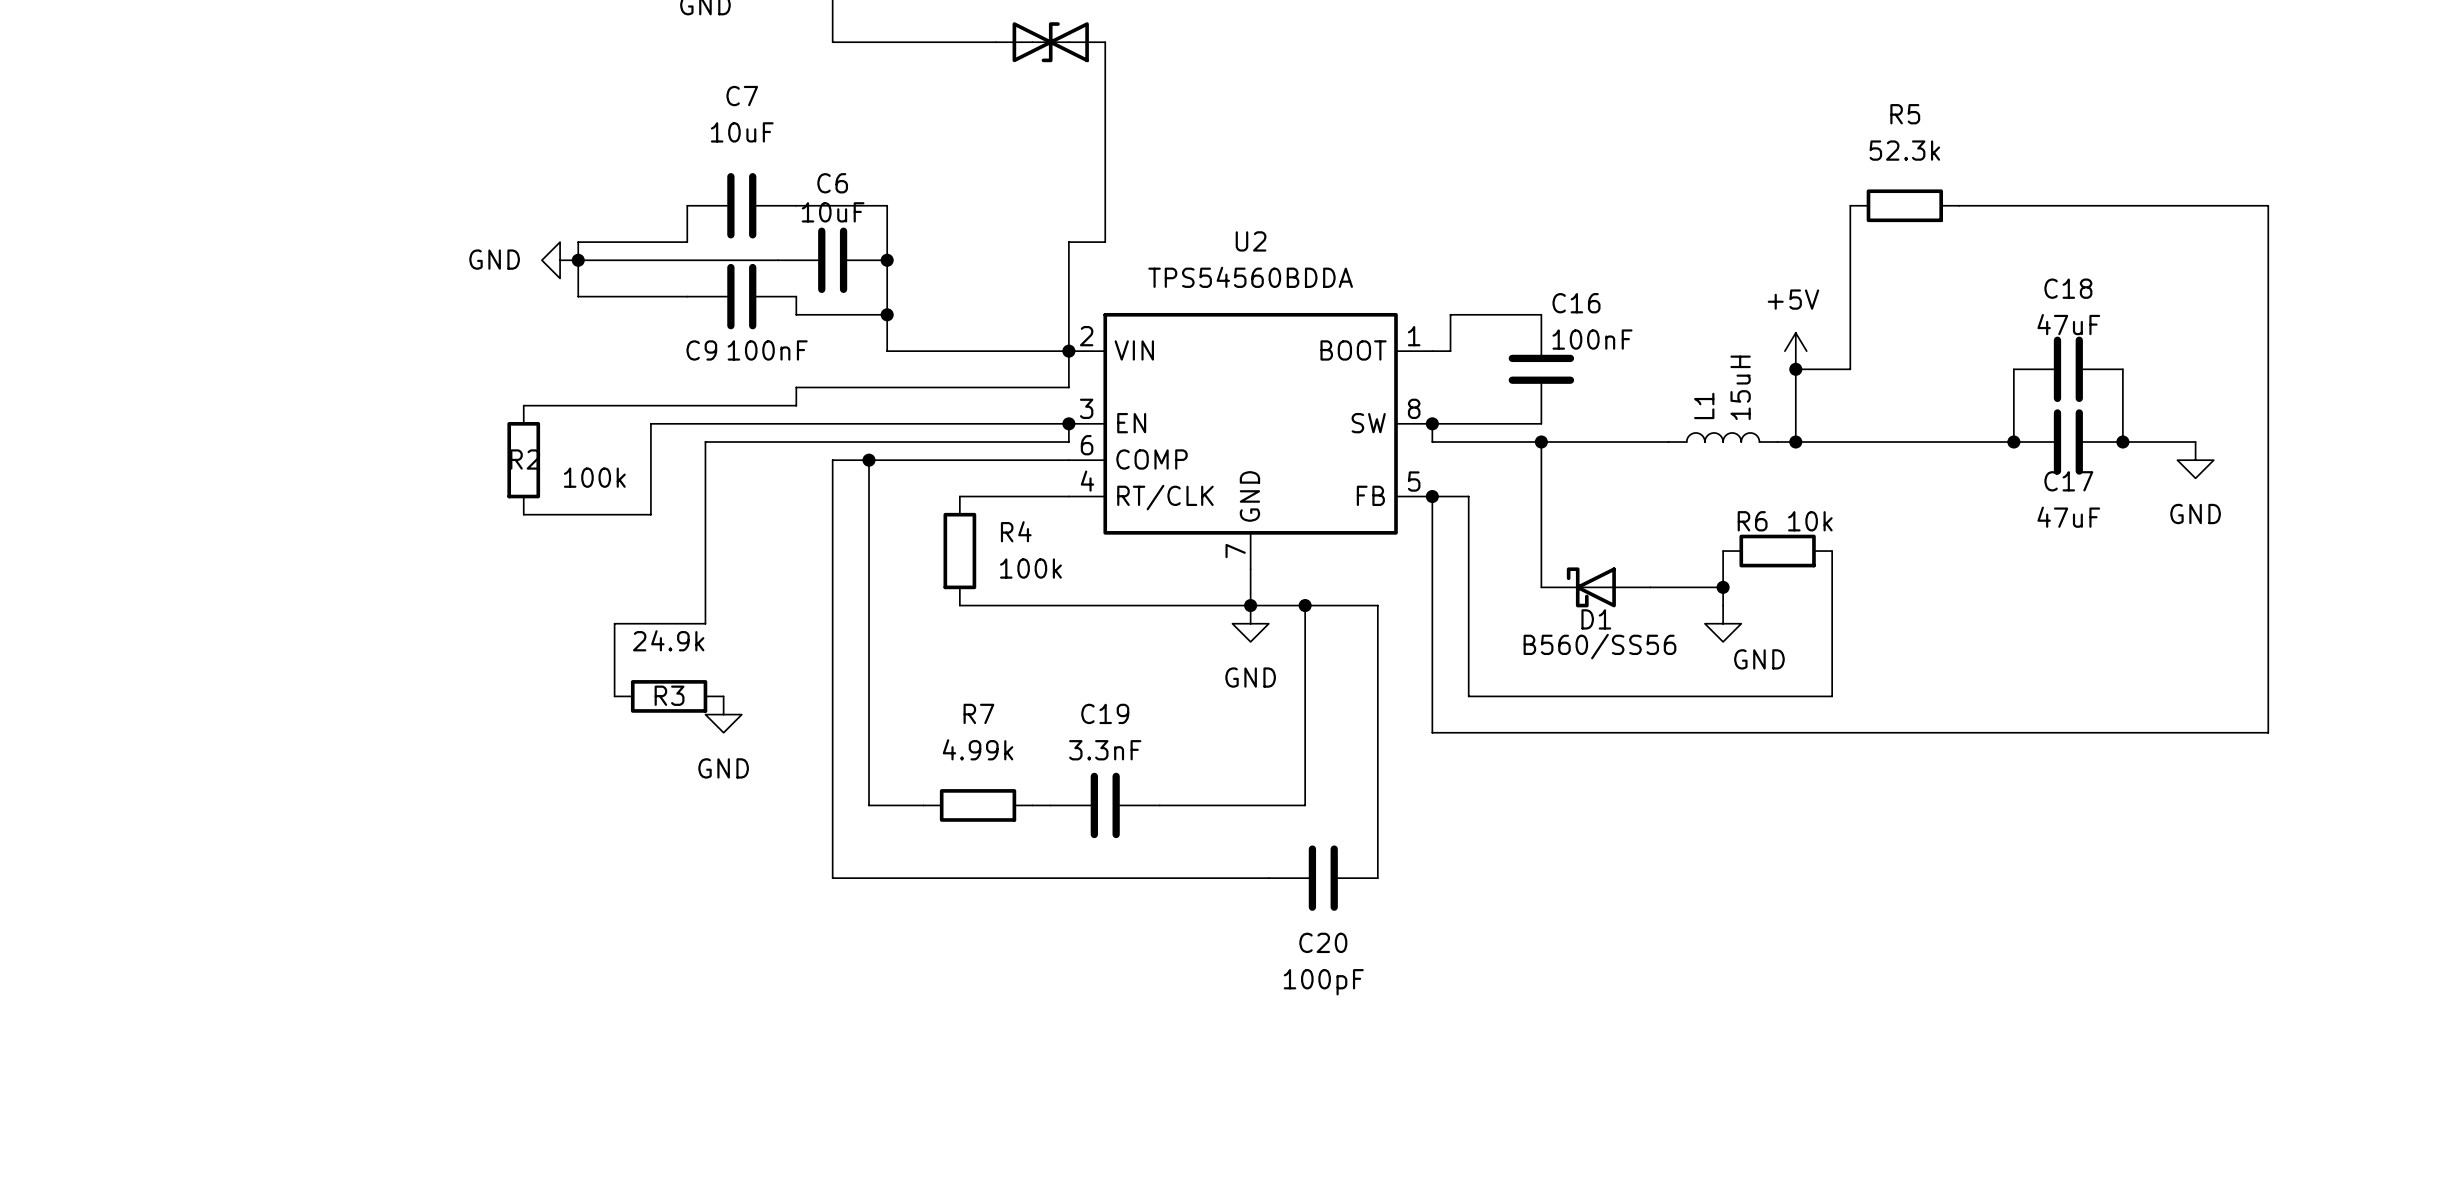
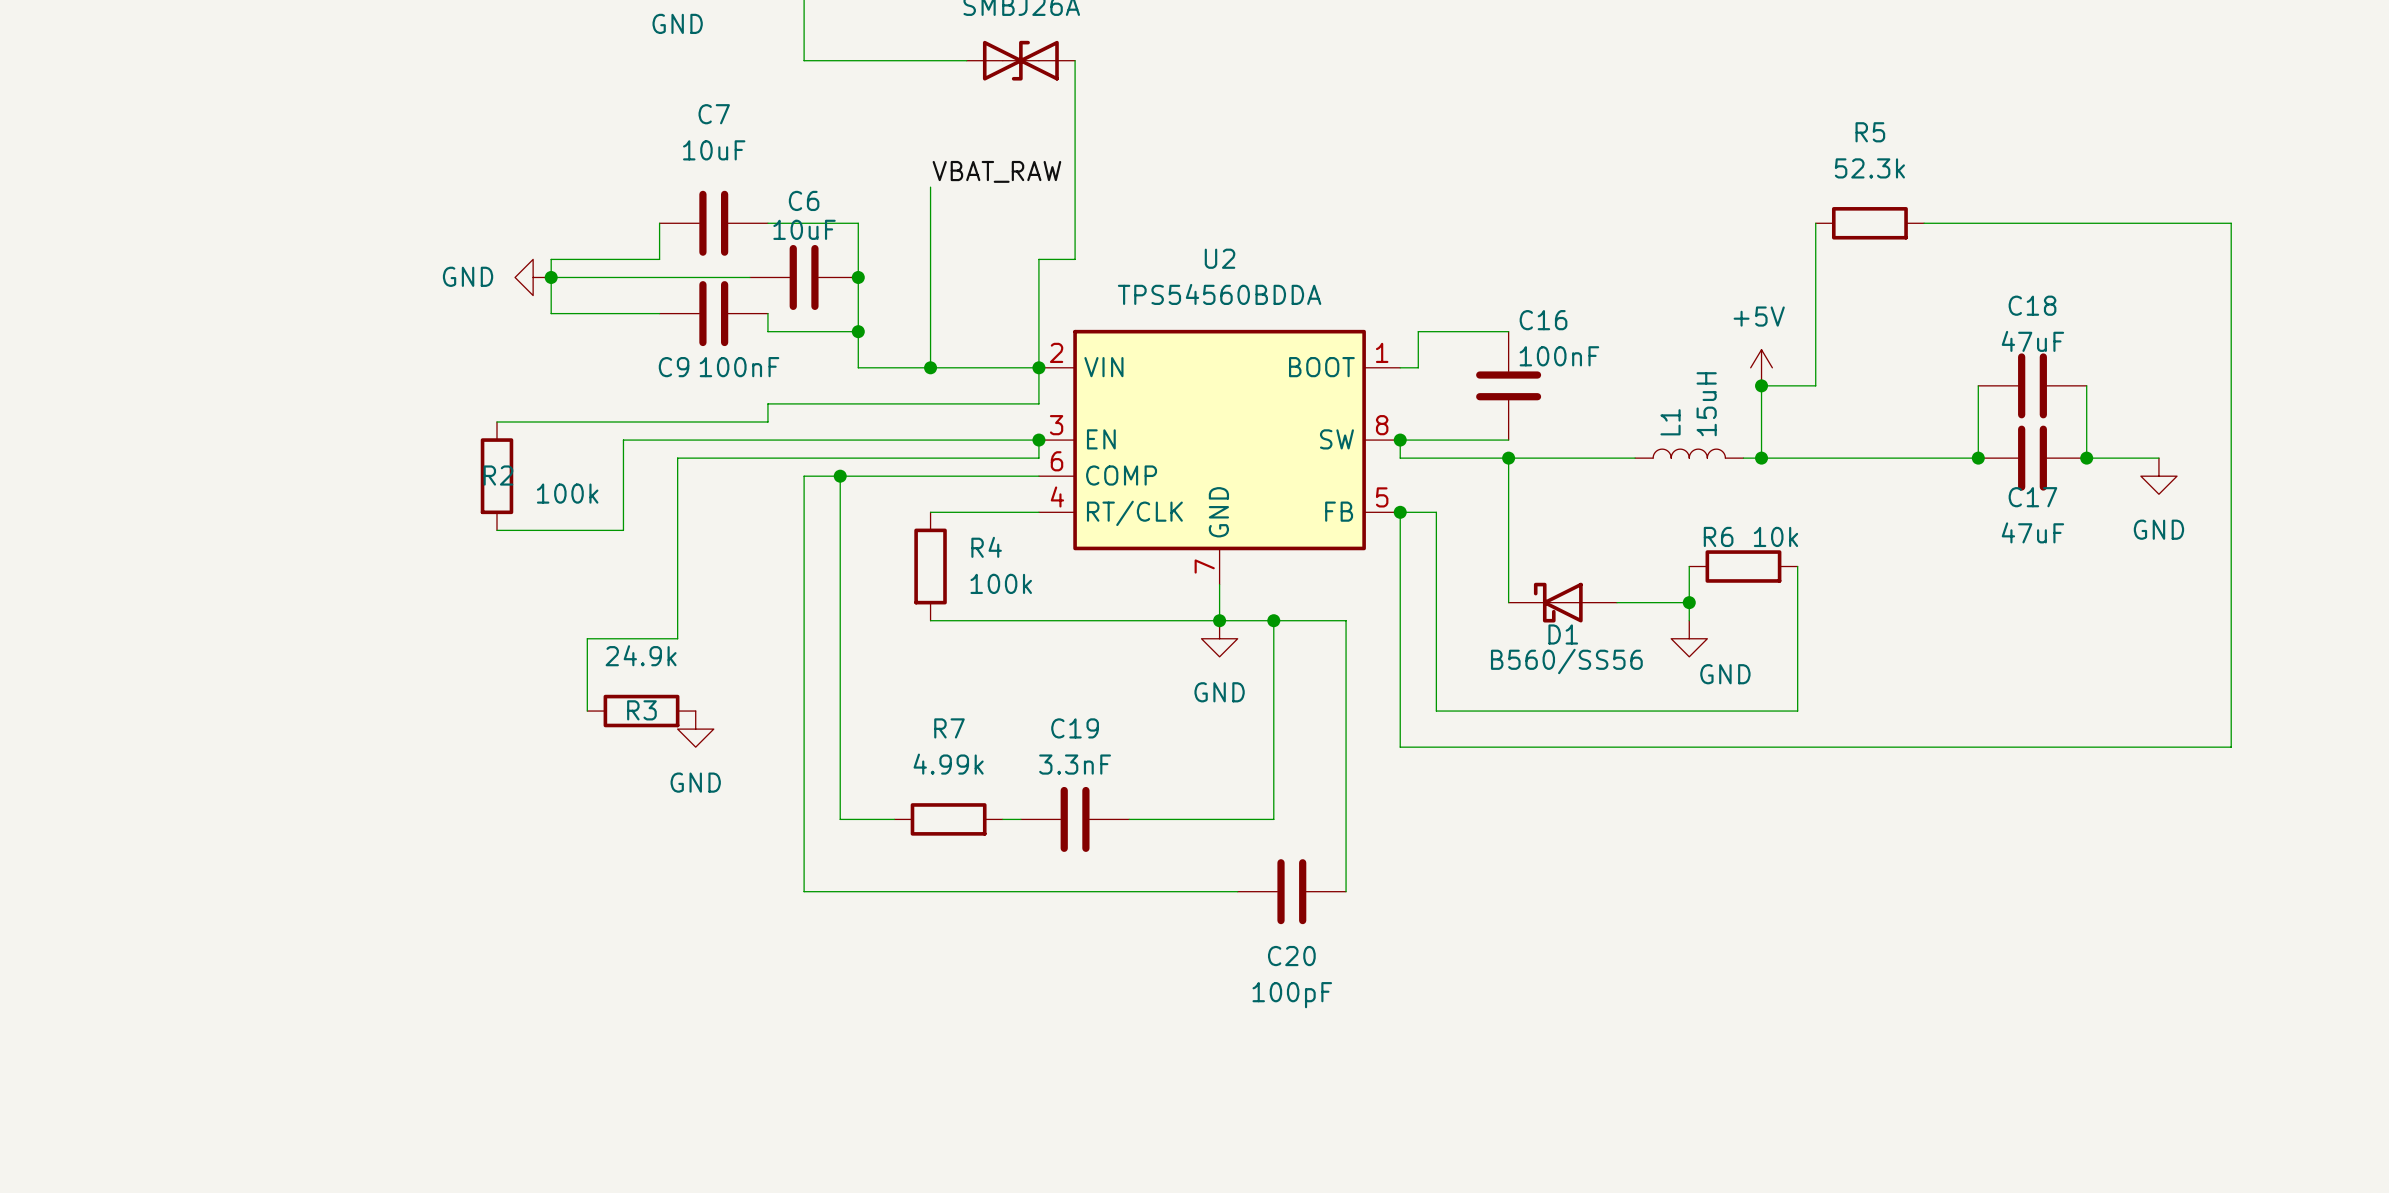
label: none -> VBAT_RAW (996, 171)
wire: none -> (930, 187) (930, 367)
junction: none -> (930, 367)

